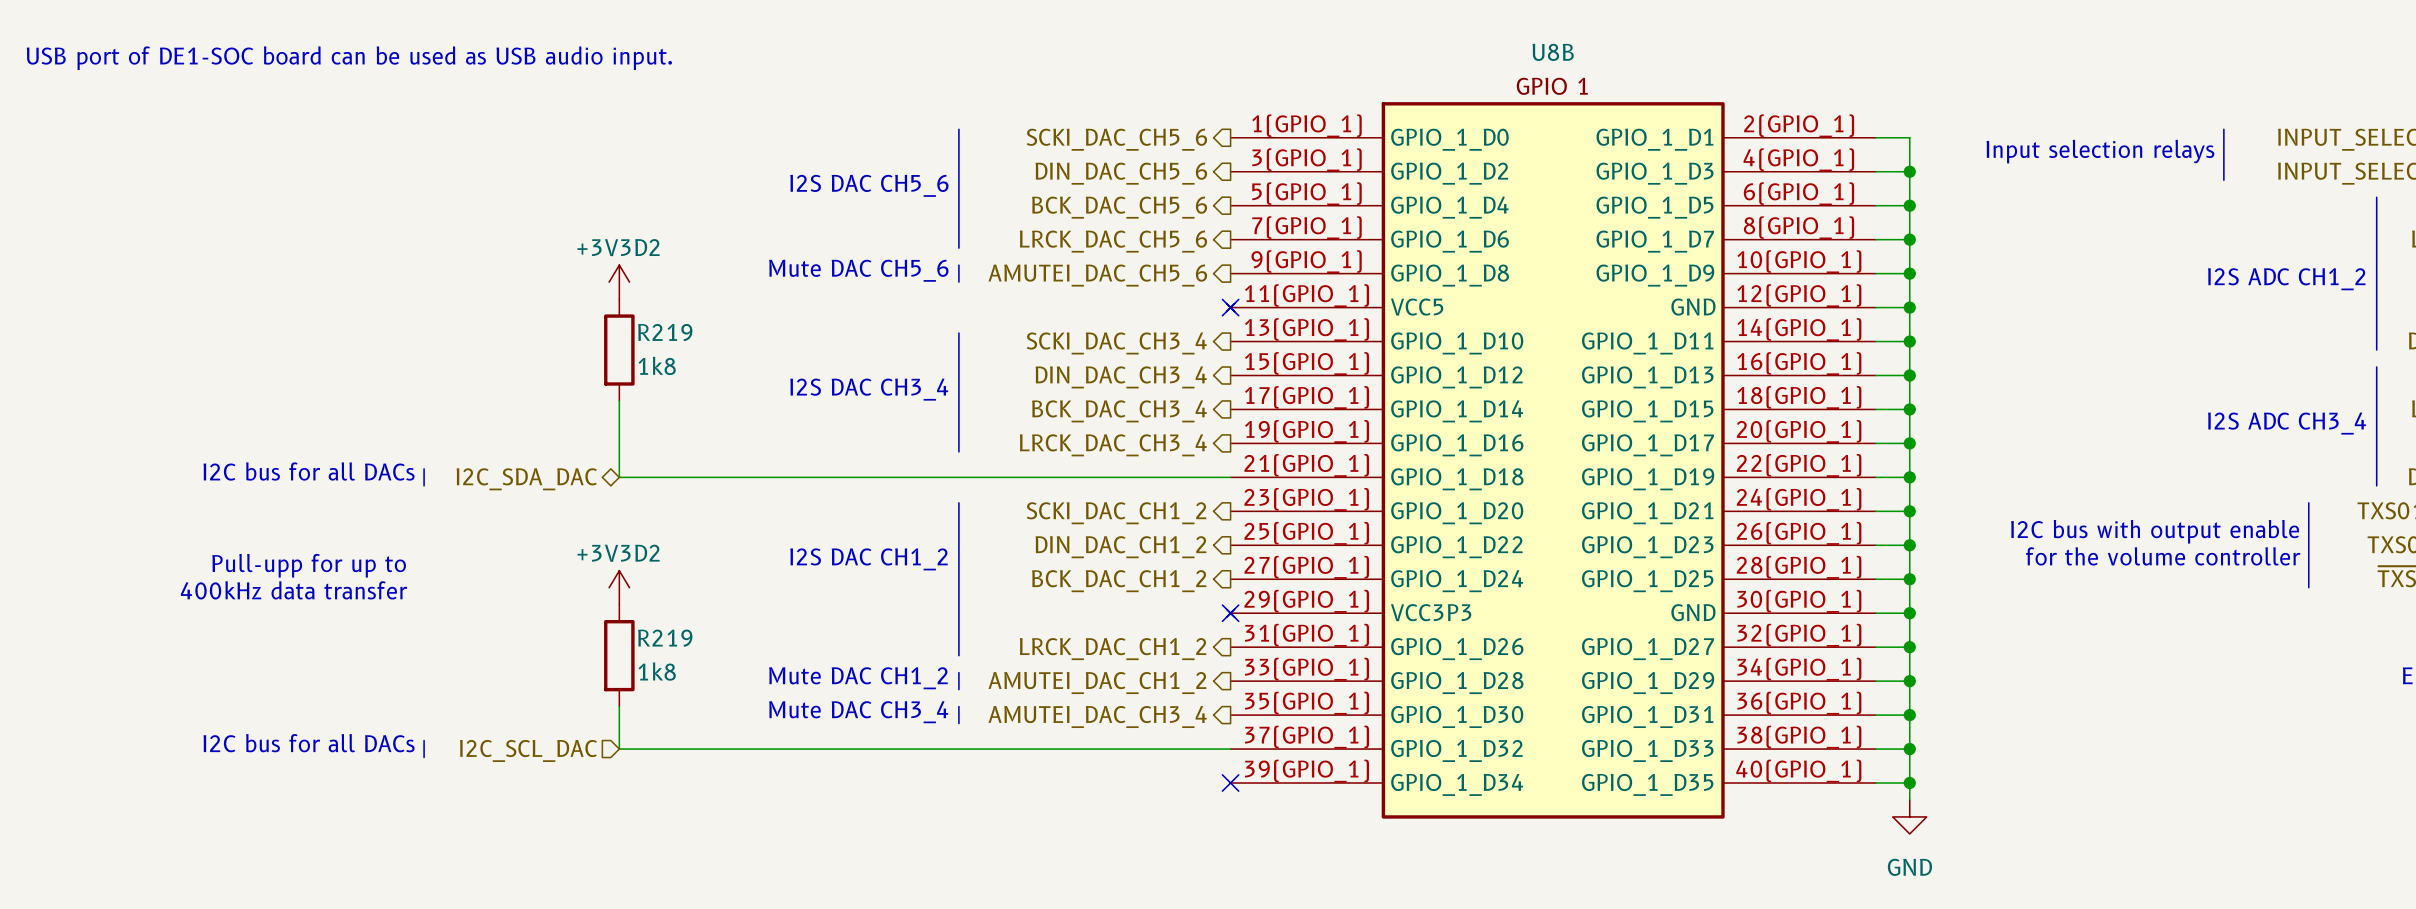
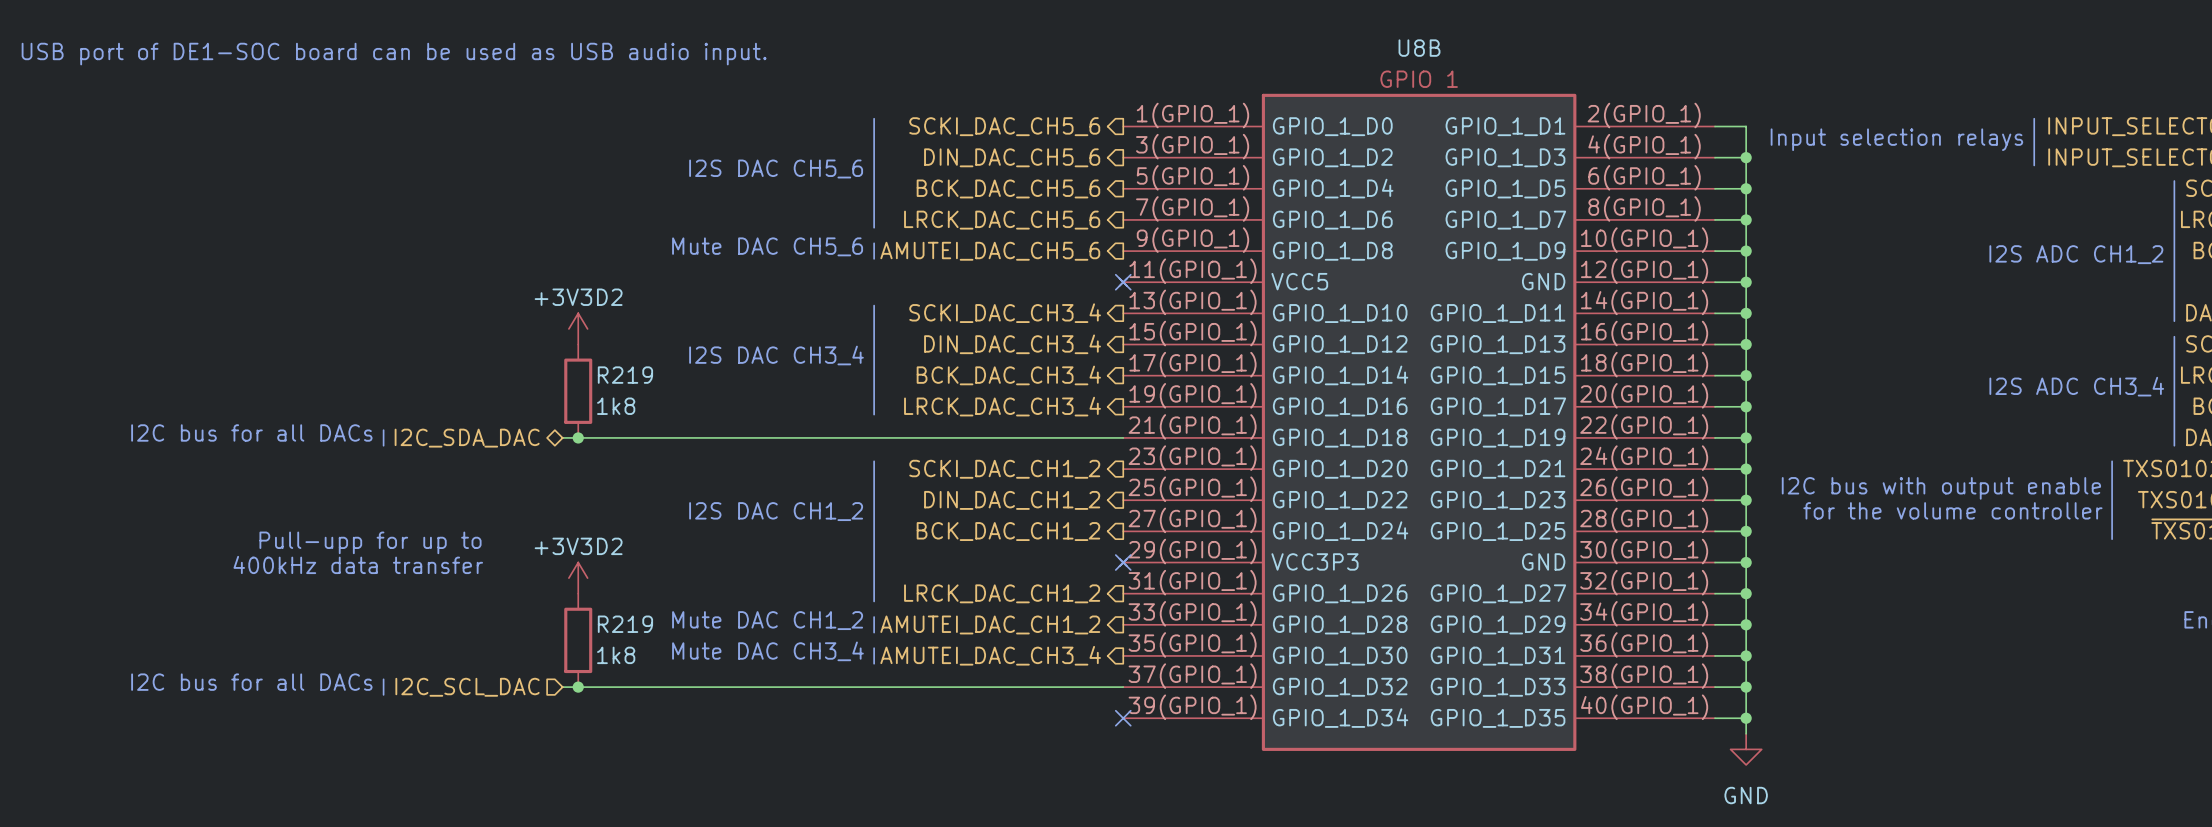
power symbol position: +3V3D2 (619, 282) -> +3V3D2 (578, 328)
R219 position: (619, 350) -> (578, 391)
wire: (619, 400) (619, 477) -> none
junction: none -> (578, 437)
text position: Pull-upp for up to (309, 565) -> Pull-upp for up to (370, 542)
power symbol position: +3V3D2 (619, 587) -> +3V3D2 (578, 578)
text position: 400kHz data transfer (293, 590) -> 400kHz data transfer (358, 564)
R219 position: (619, 655) -> (578, 640)
wire: (619, 706) (619, 749) -> none
junction: none -> (578, 687)

